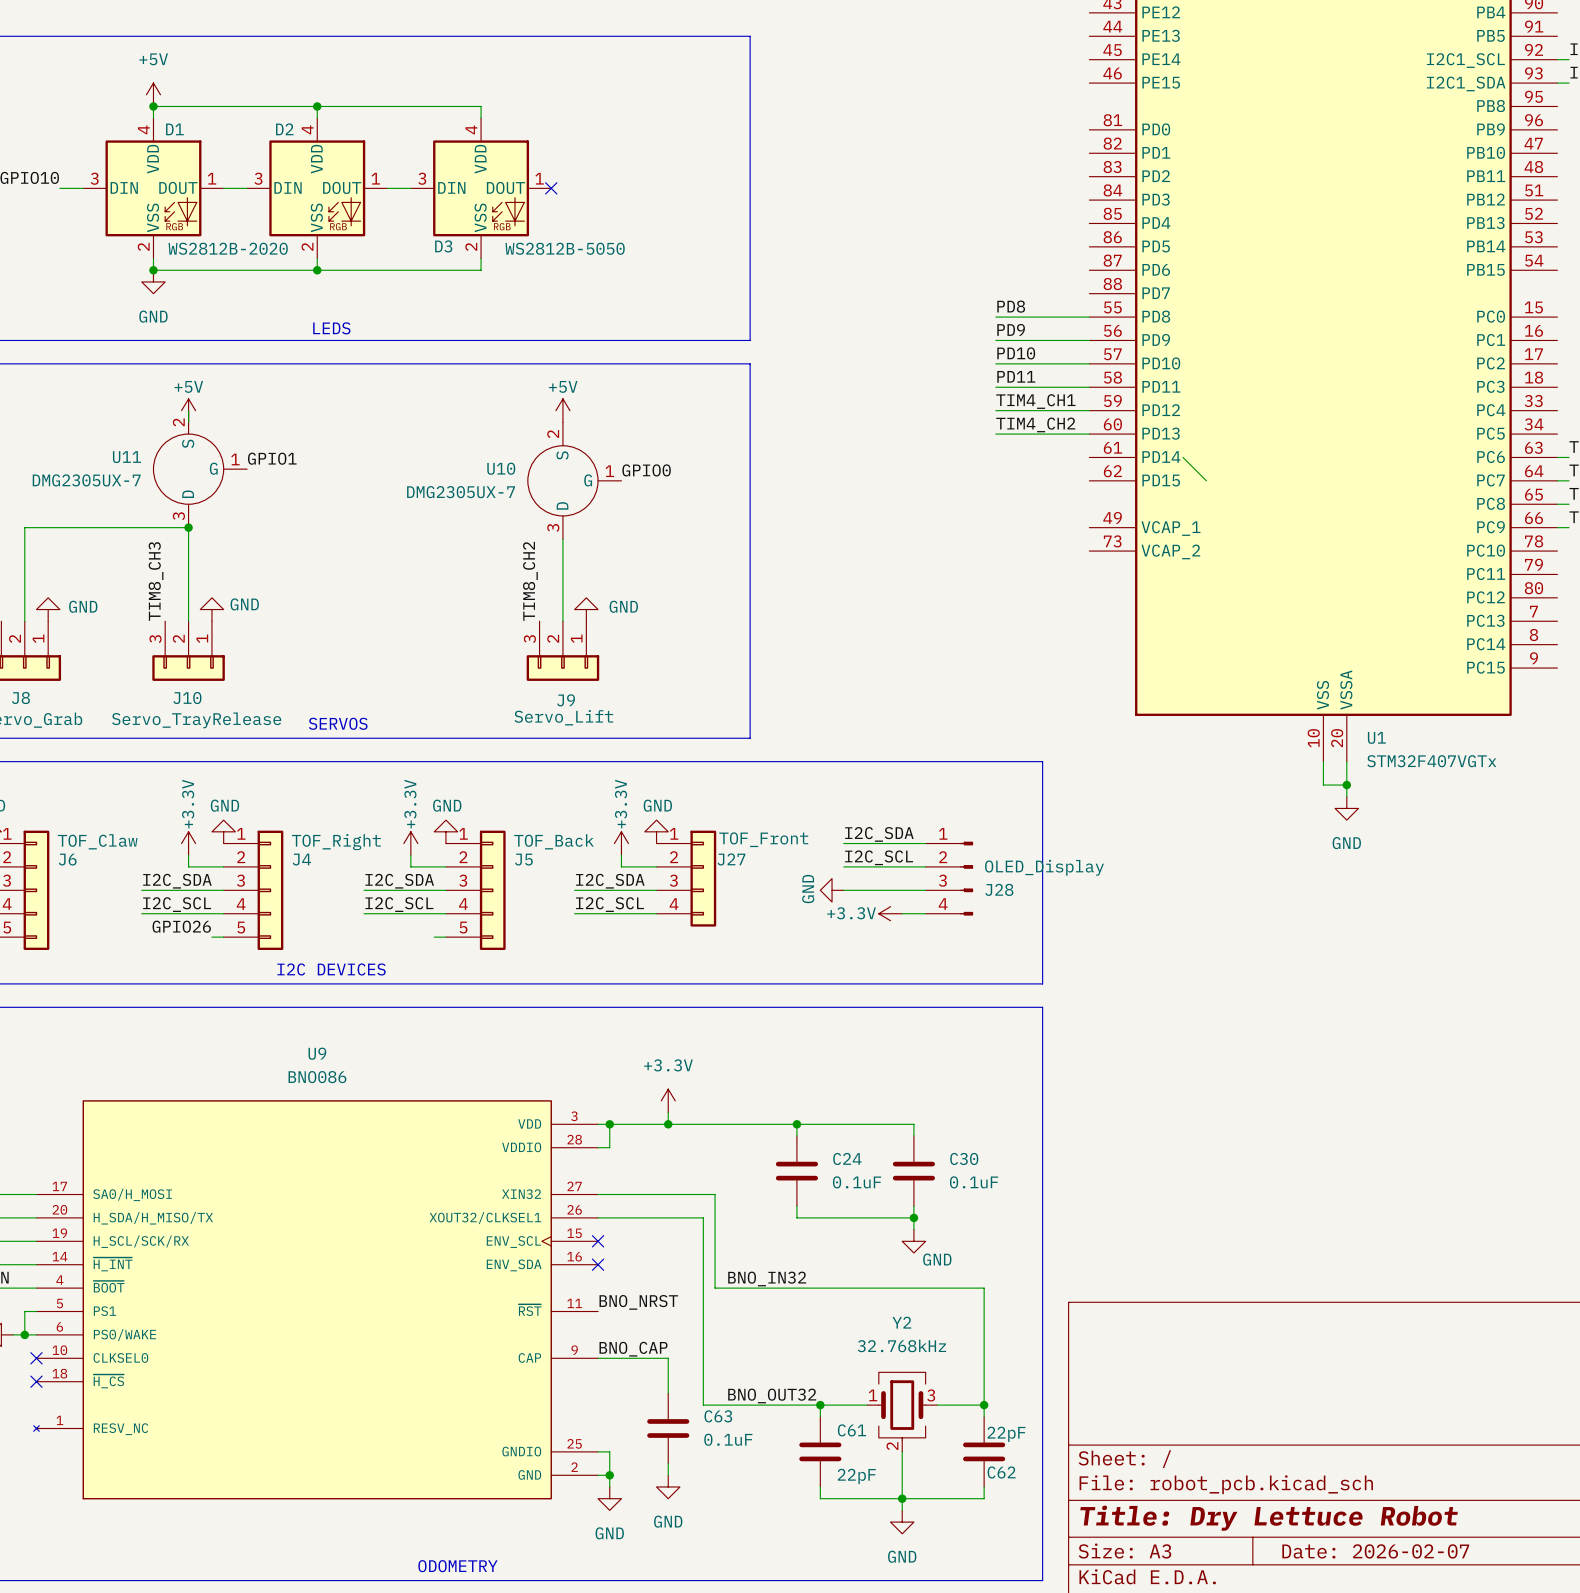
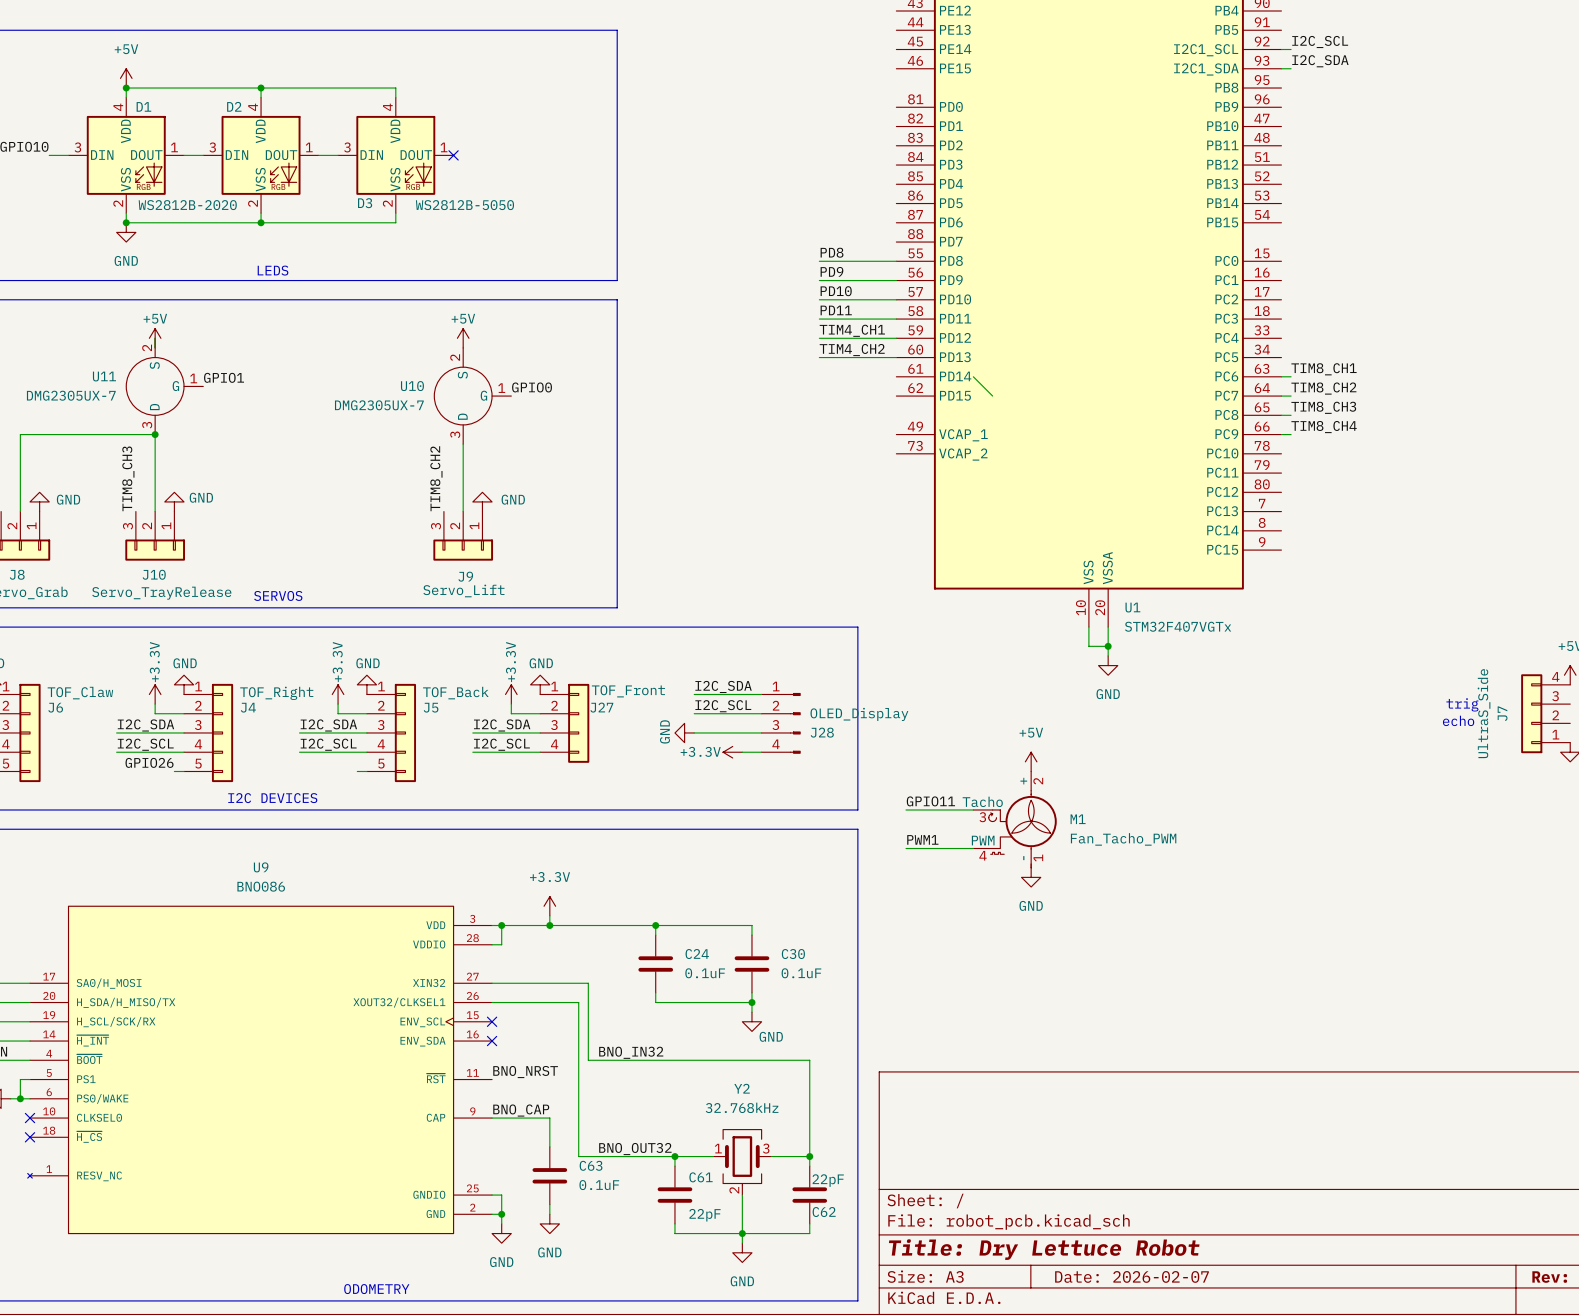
power symbol: none -> +5V (1031, 761)
label: none -> GPIO11 (930, 801)
wire: none -> (906, 809) (973, 809)
M1: none -> Fan_Tacho_PWM (1015, 819)
label: none -> PWM1 (922, 839)
wire: none -> (906, 848) (973, 848)
power symbol: none -> GND (1031, 877)

